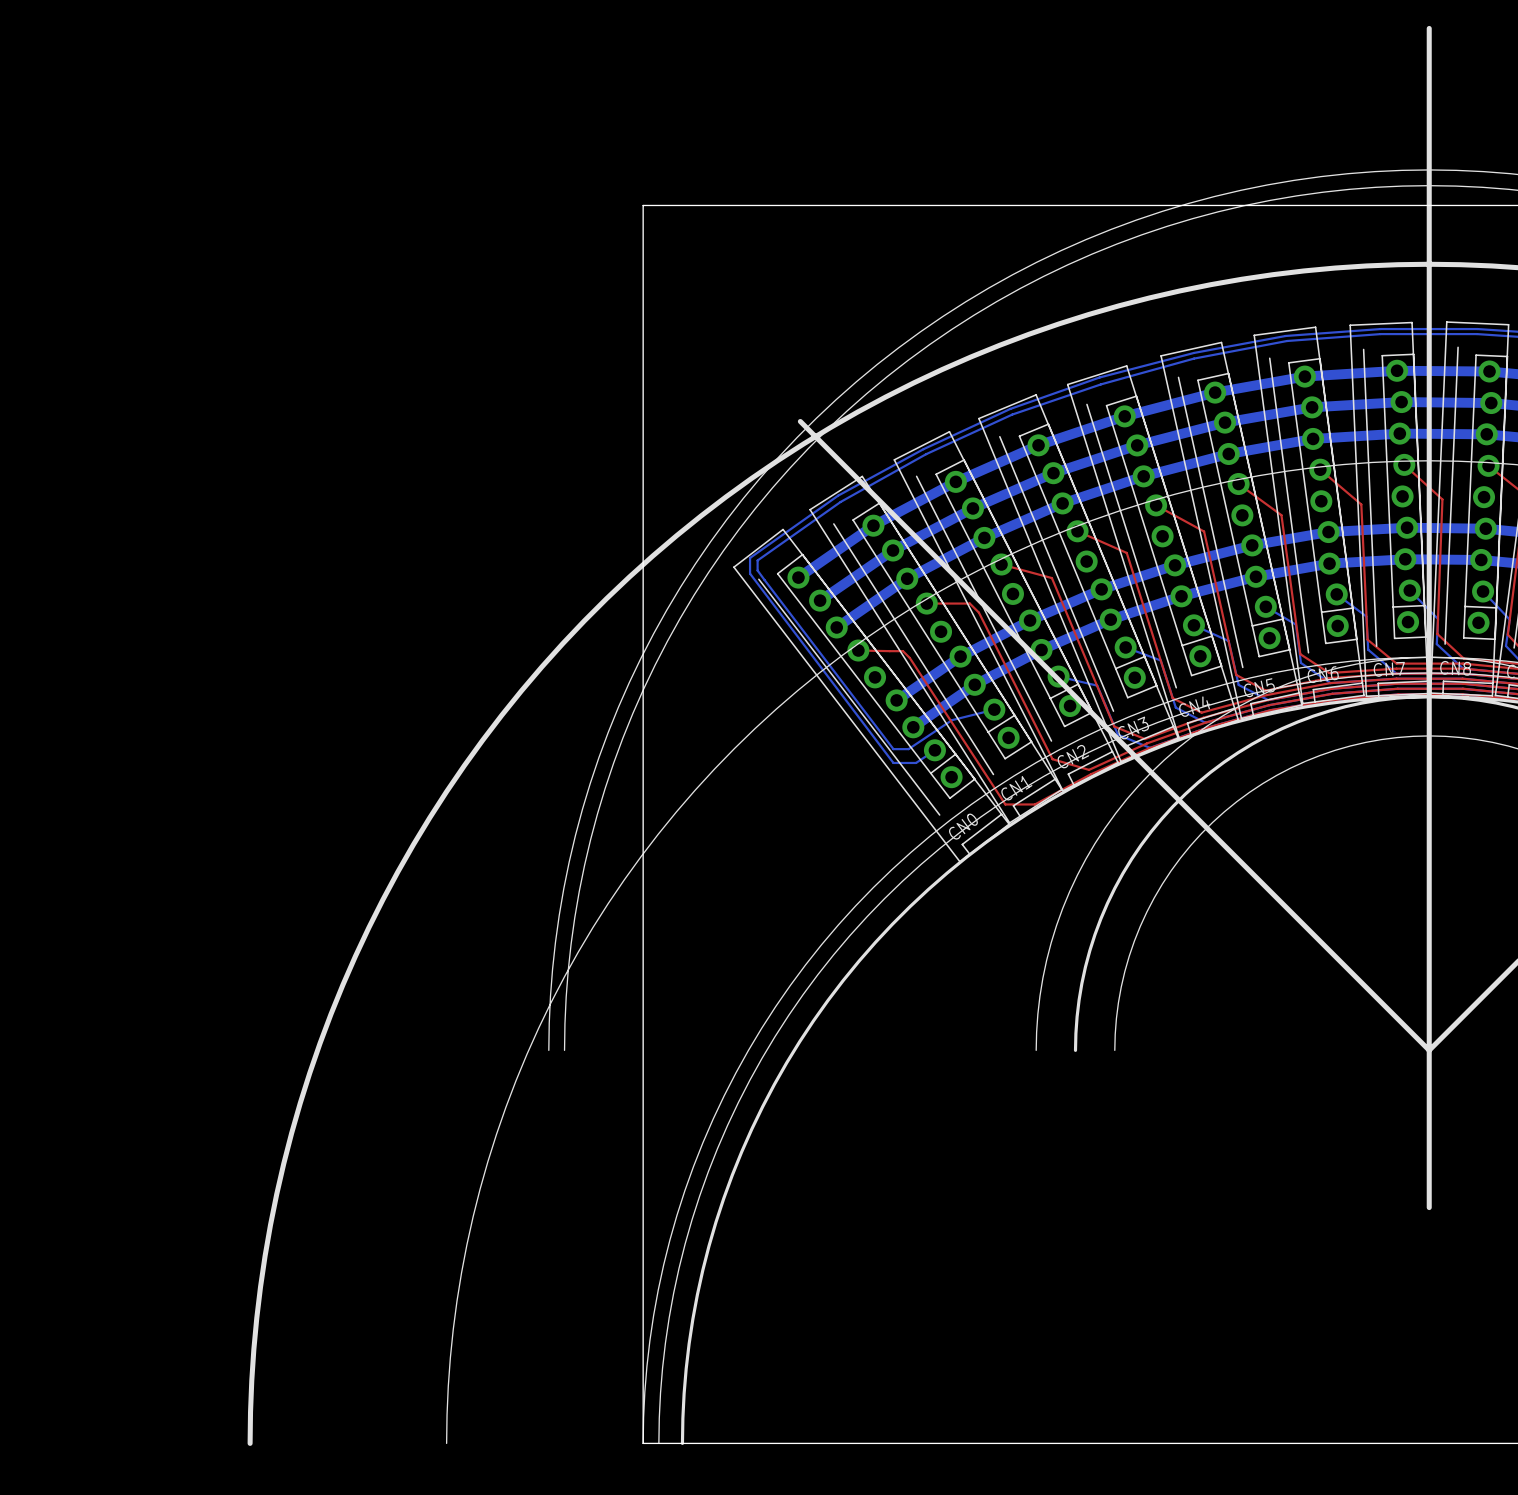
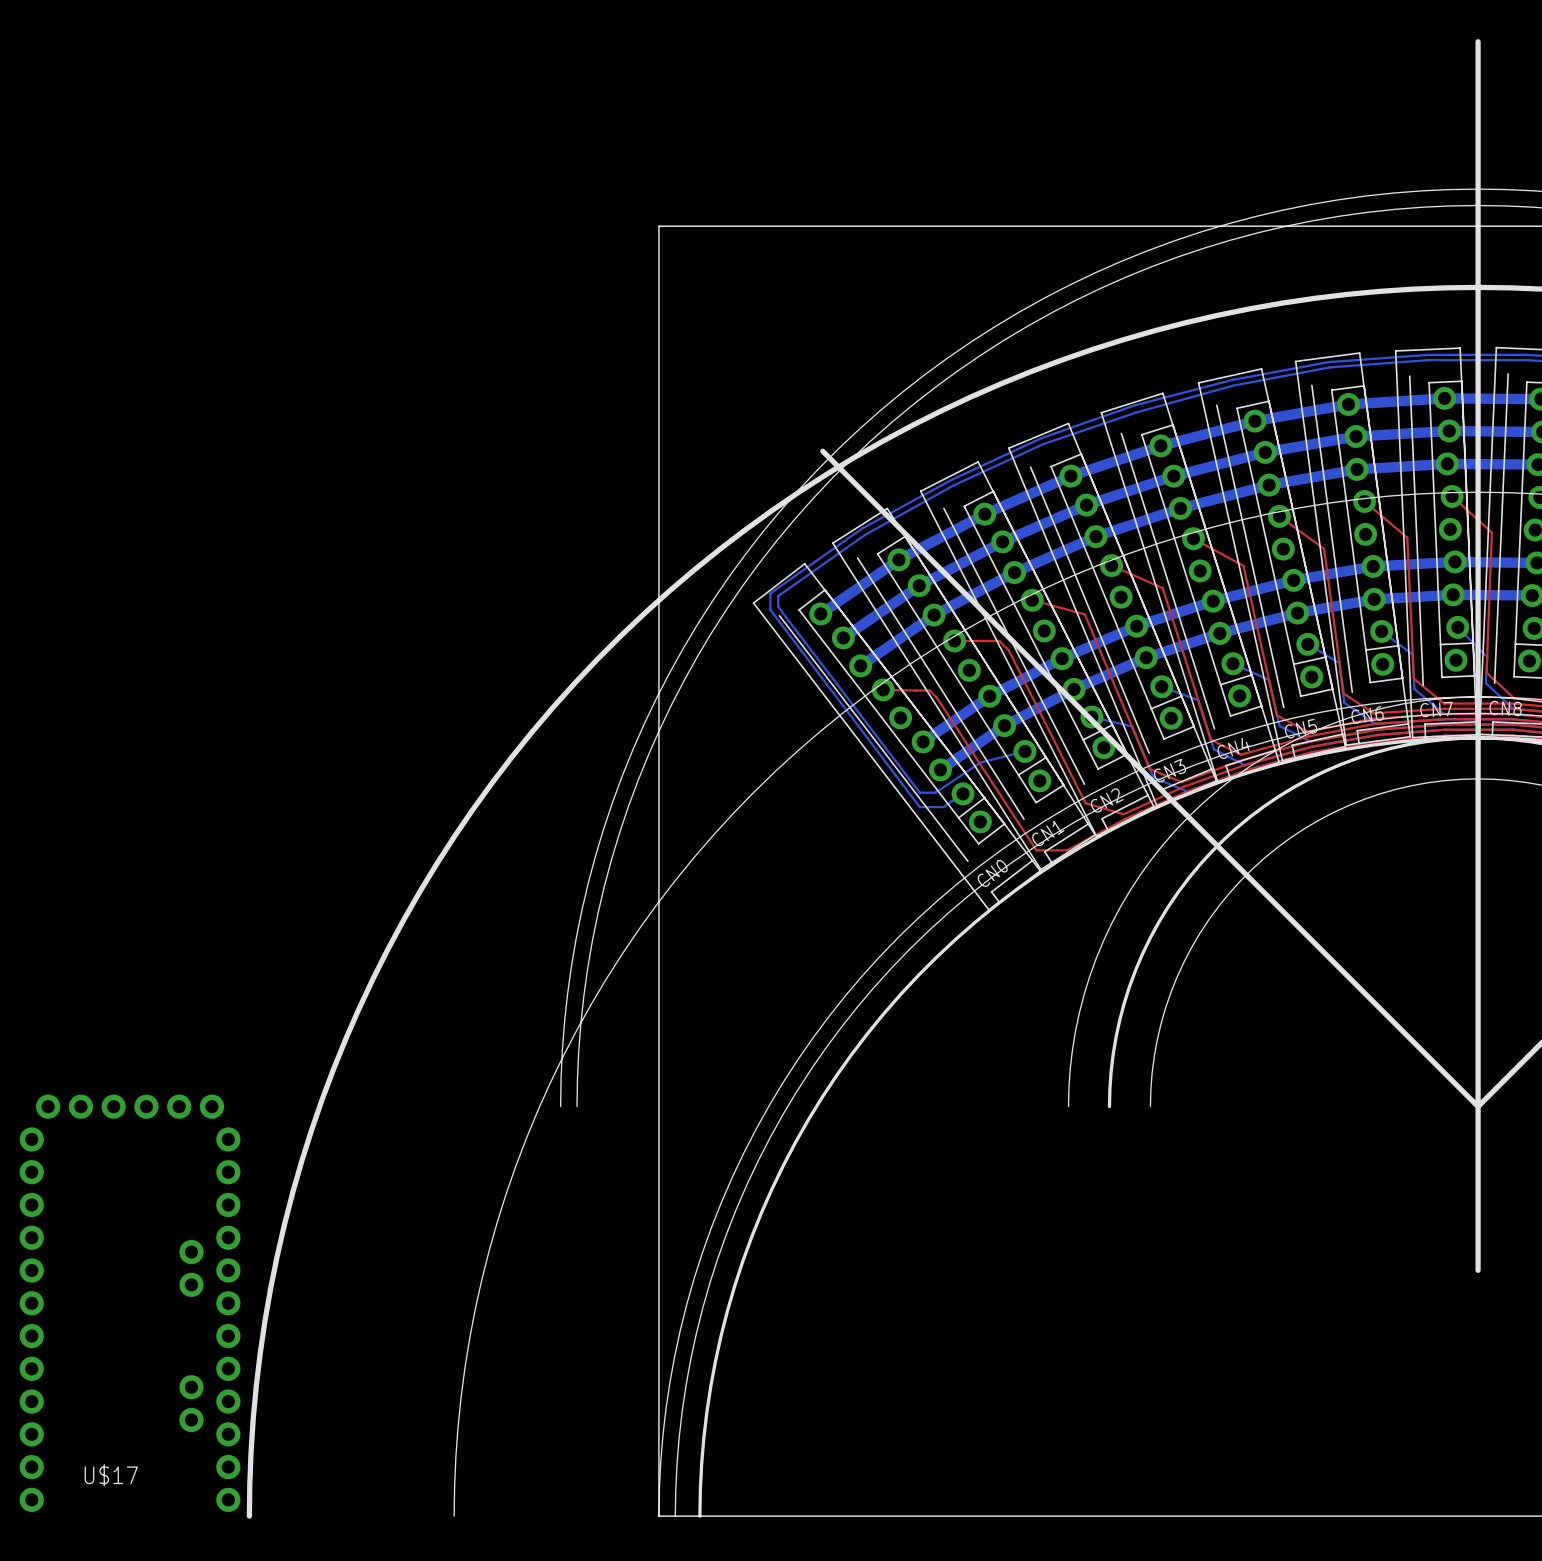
U$17: none -> (130, 1303)

